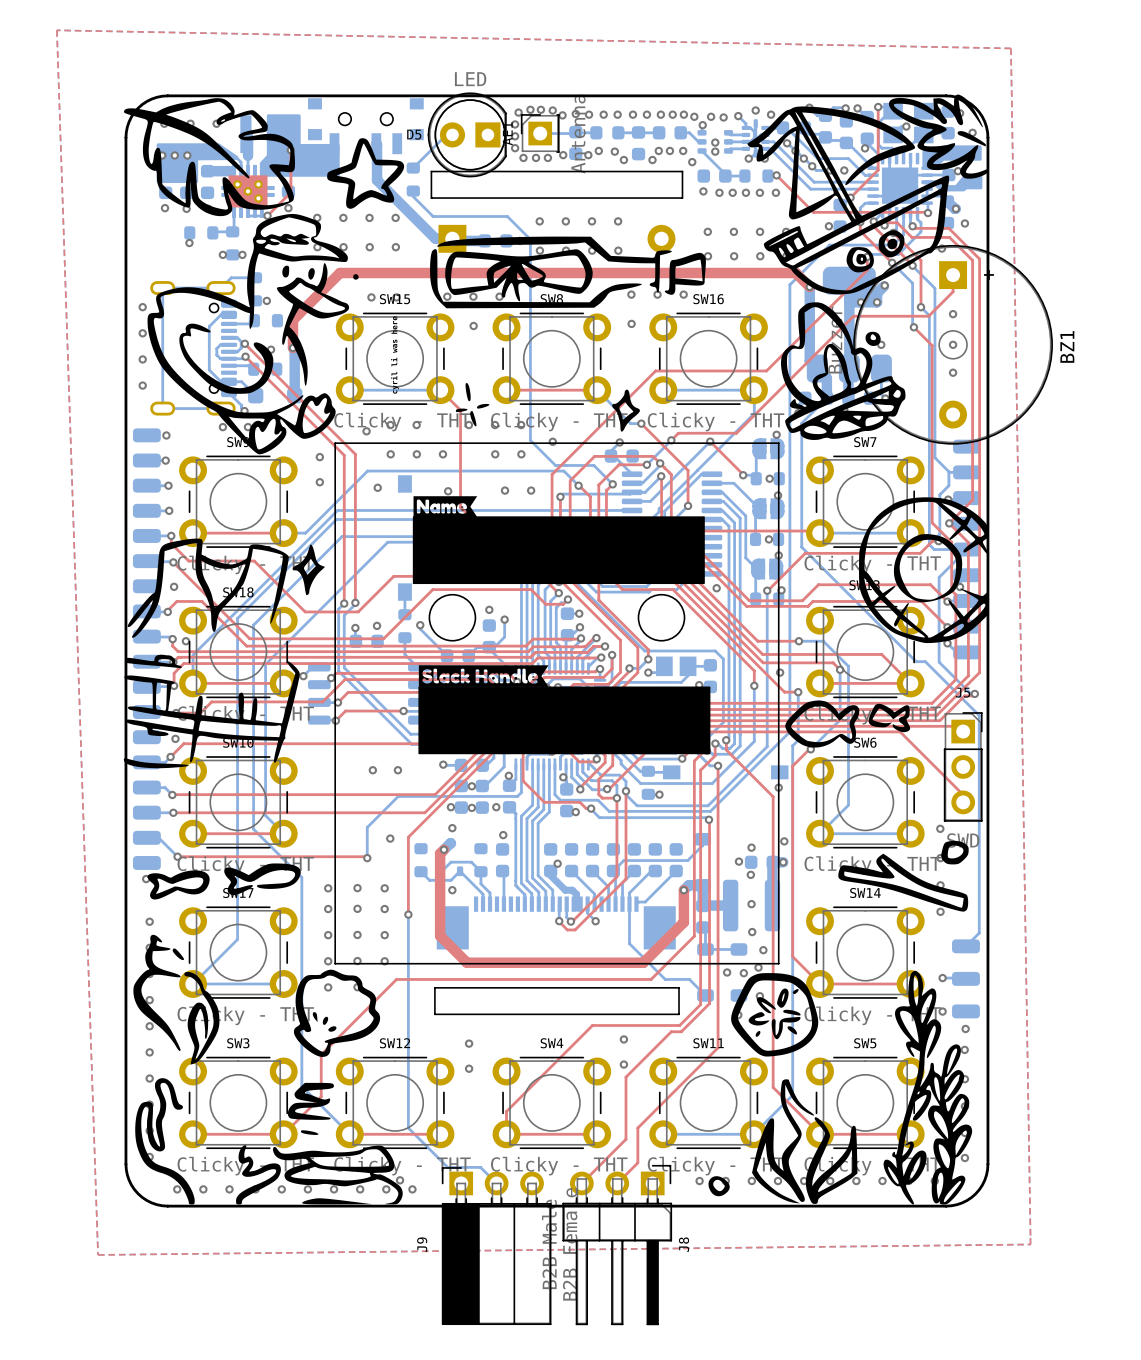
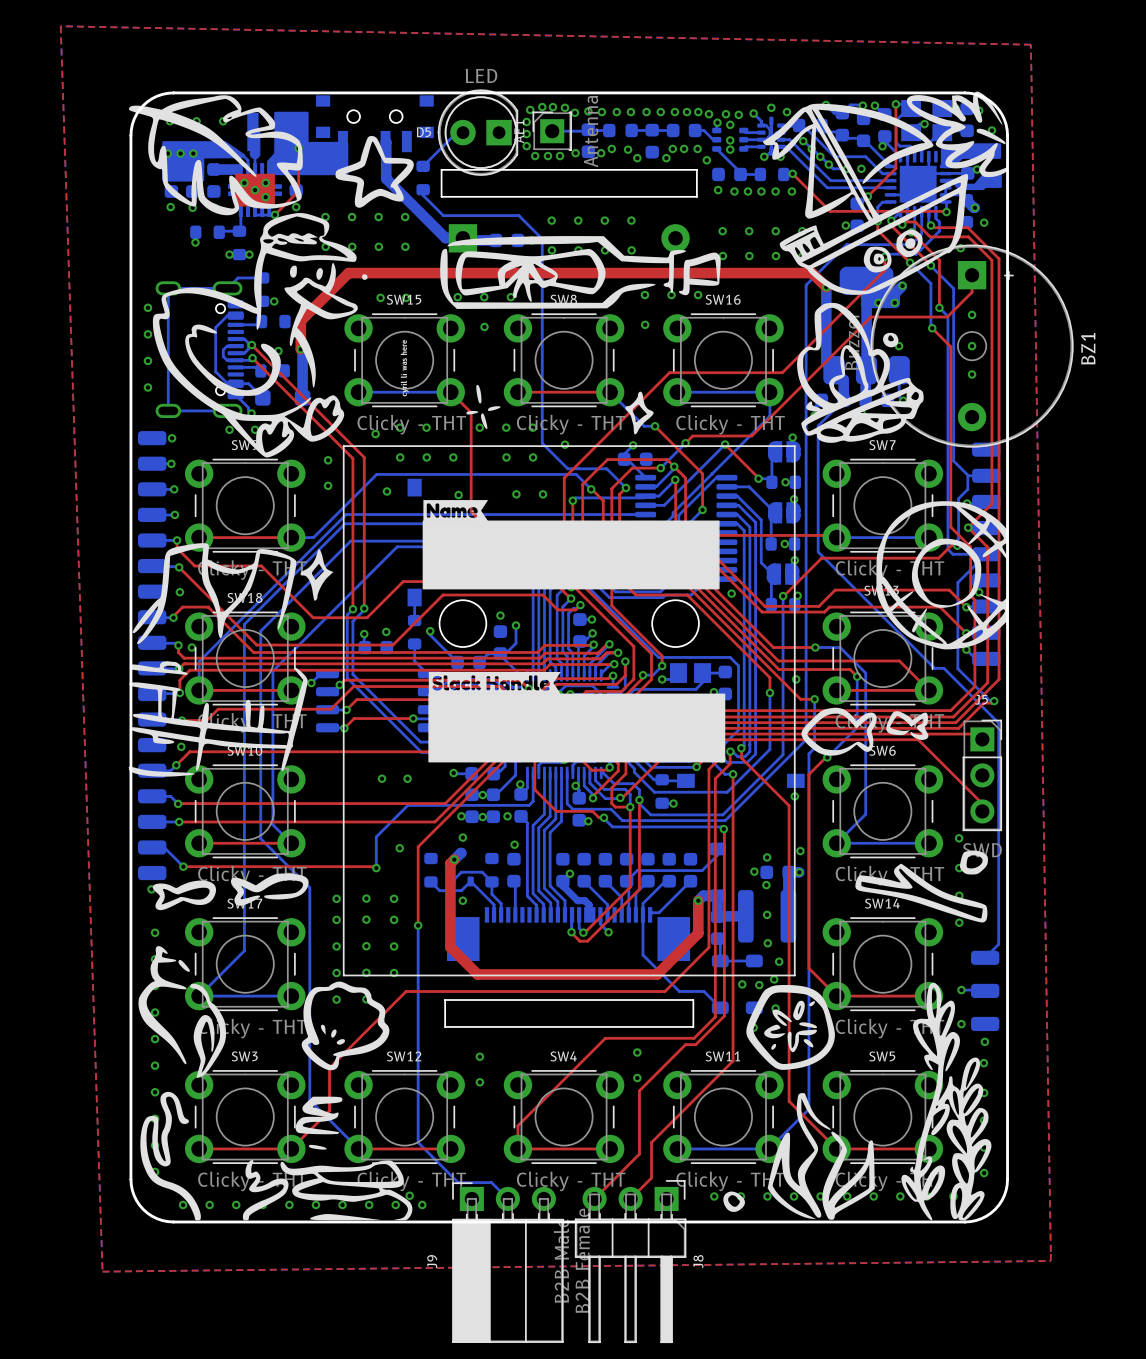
via: none -> (730, 124)

